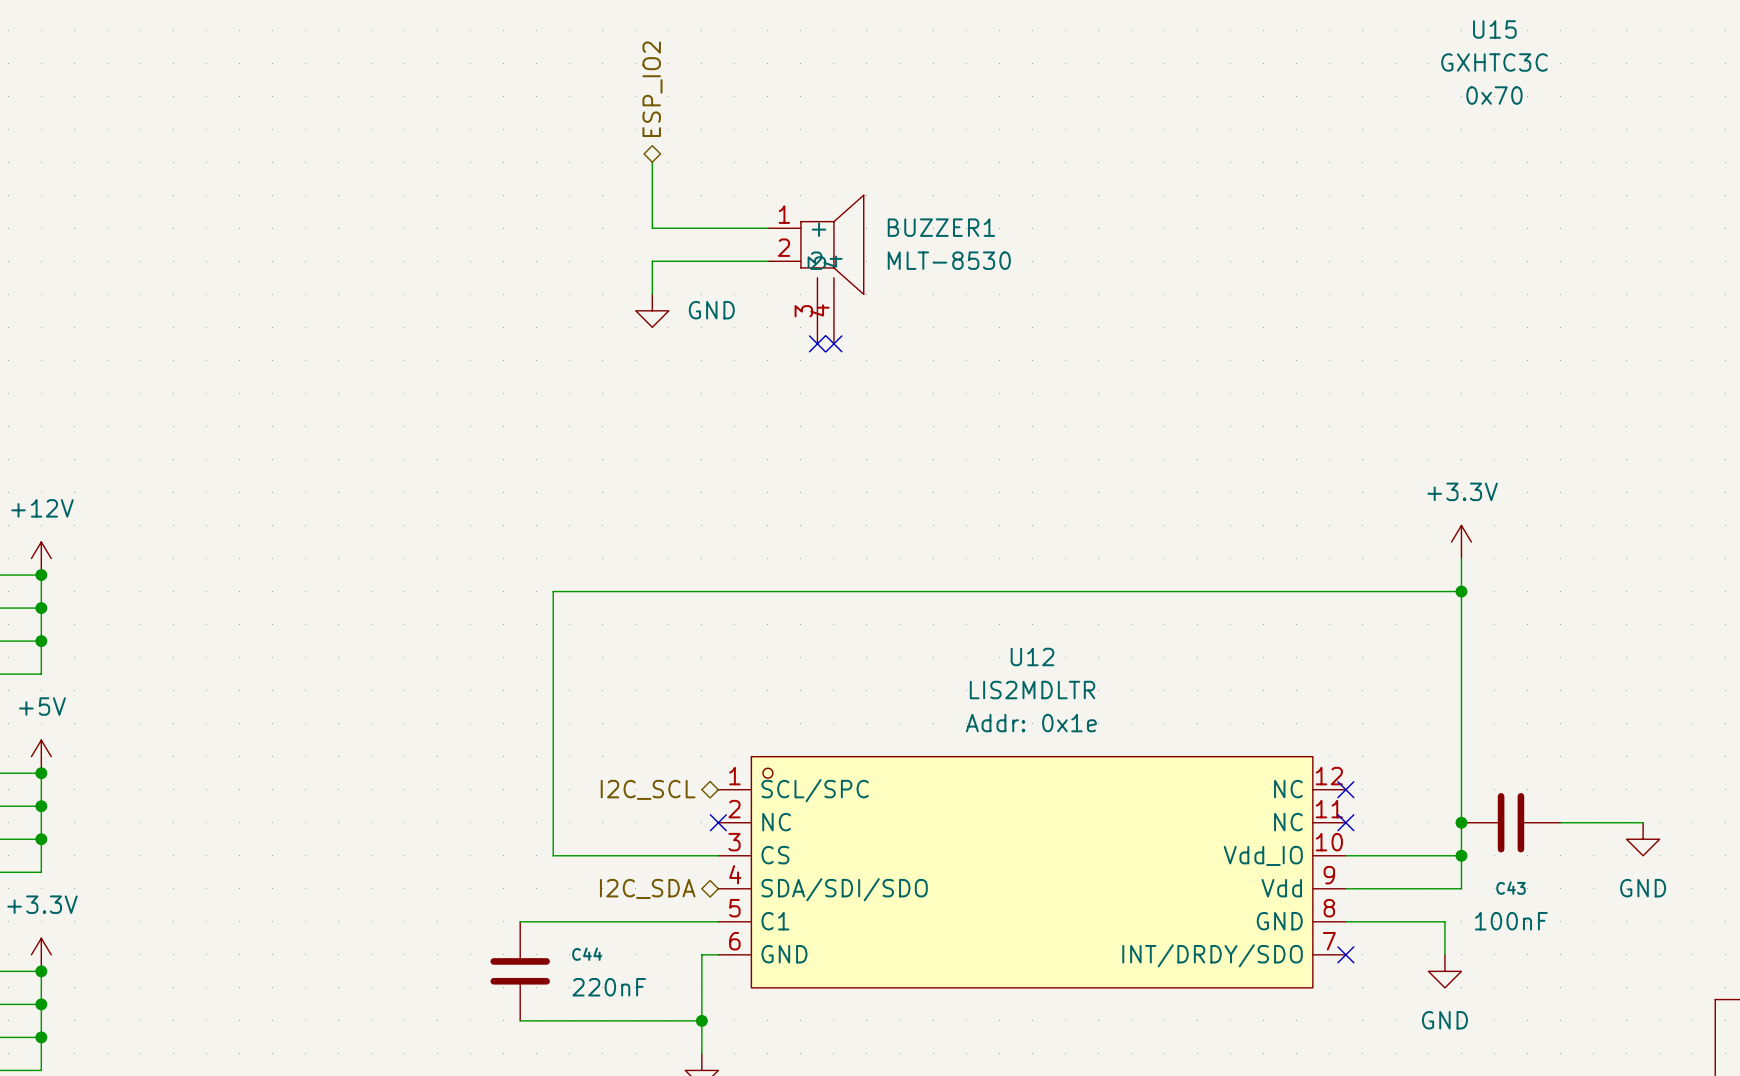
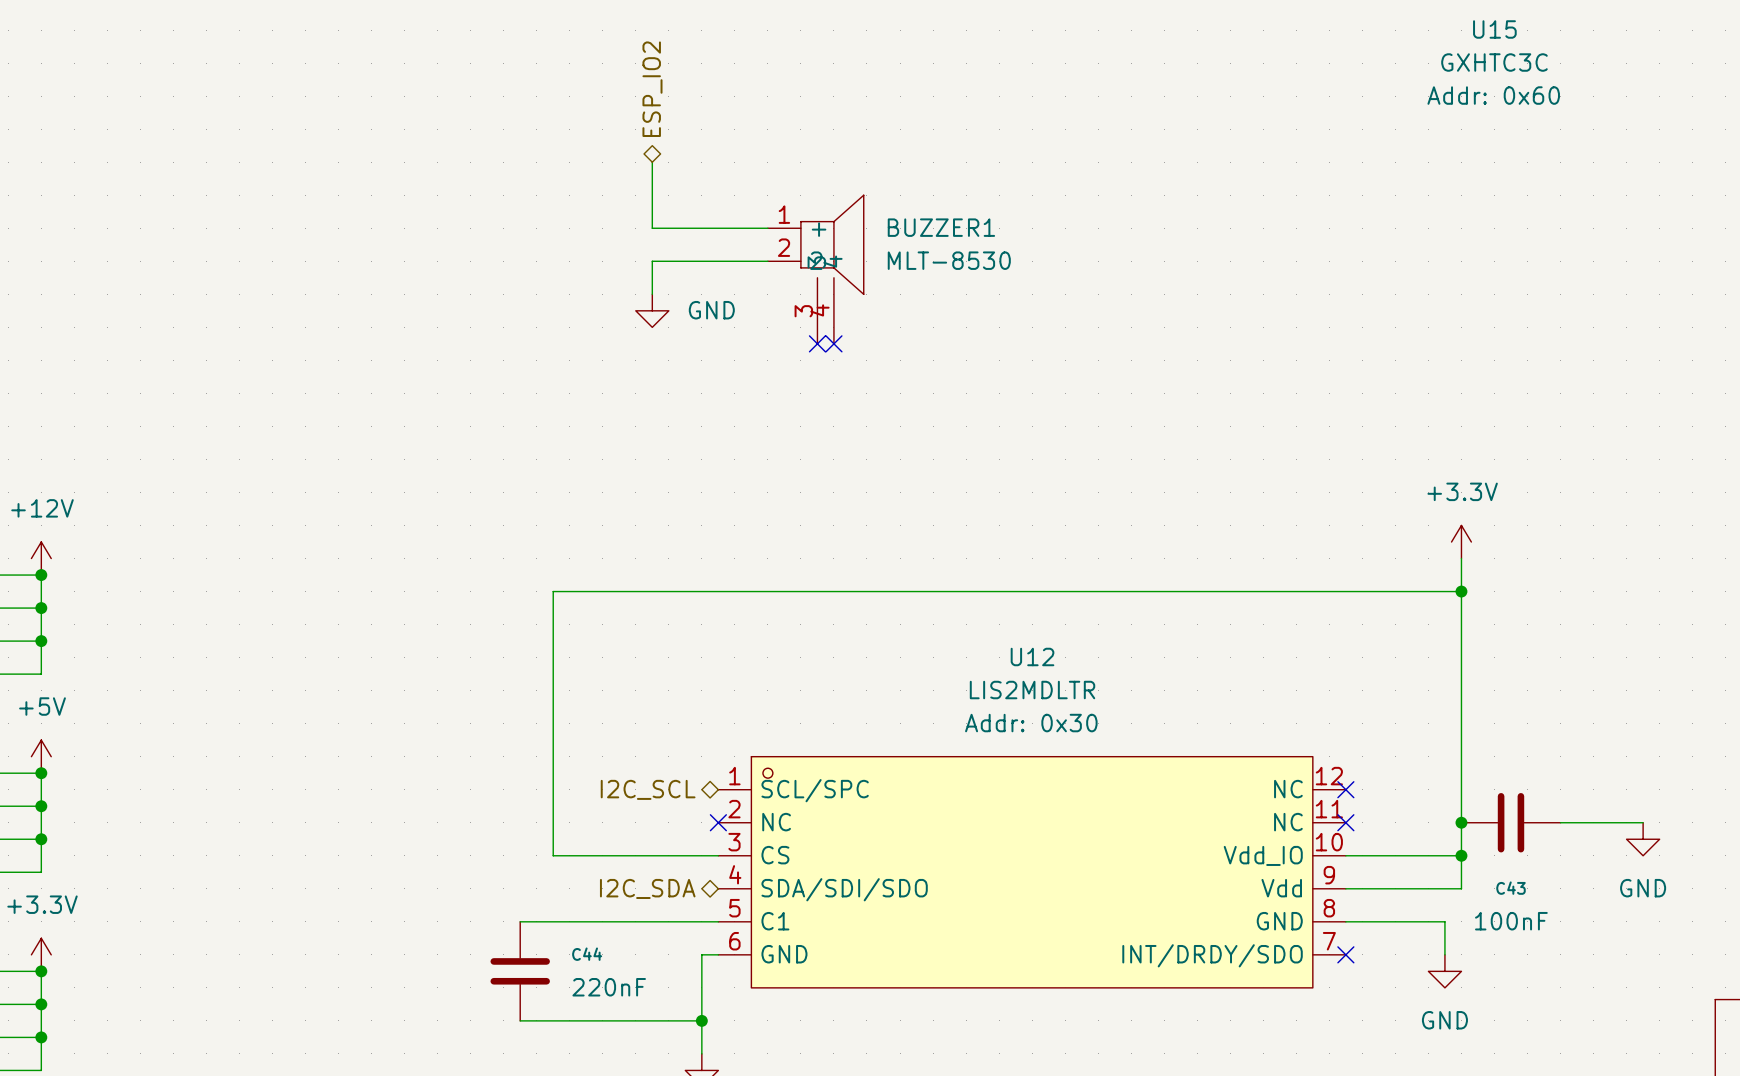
U15 text: 0x70 (1494, 95) -> Addr: 0x60 (1493, 95)
U12 text: Addr: 0x1e (1031, 723) -> Addr: 0x30 (1031, 723)

